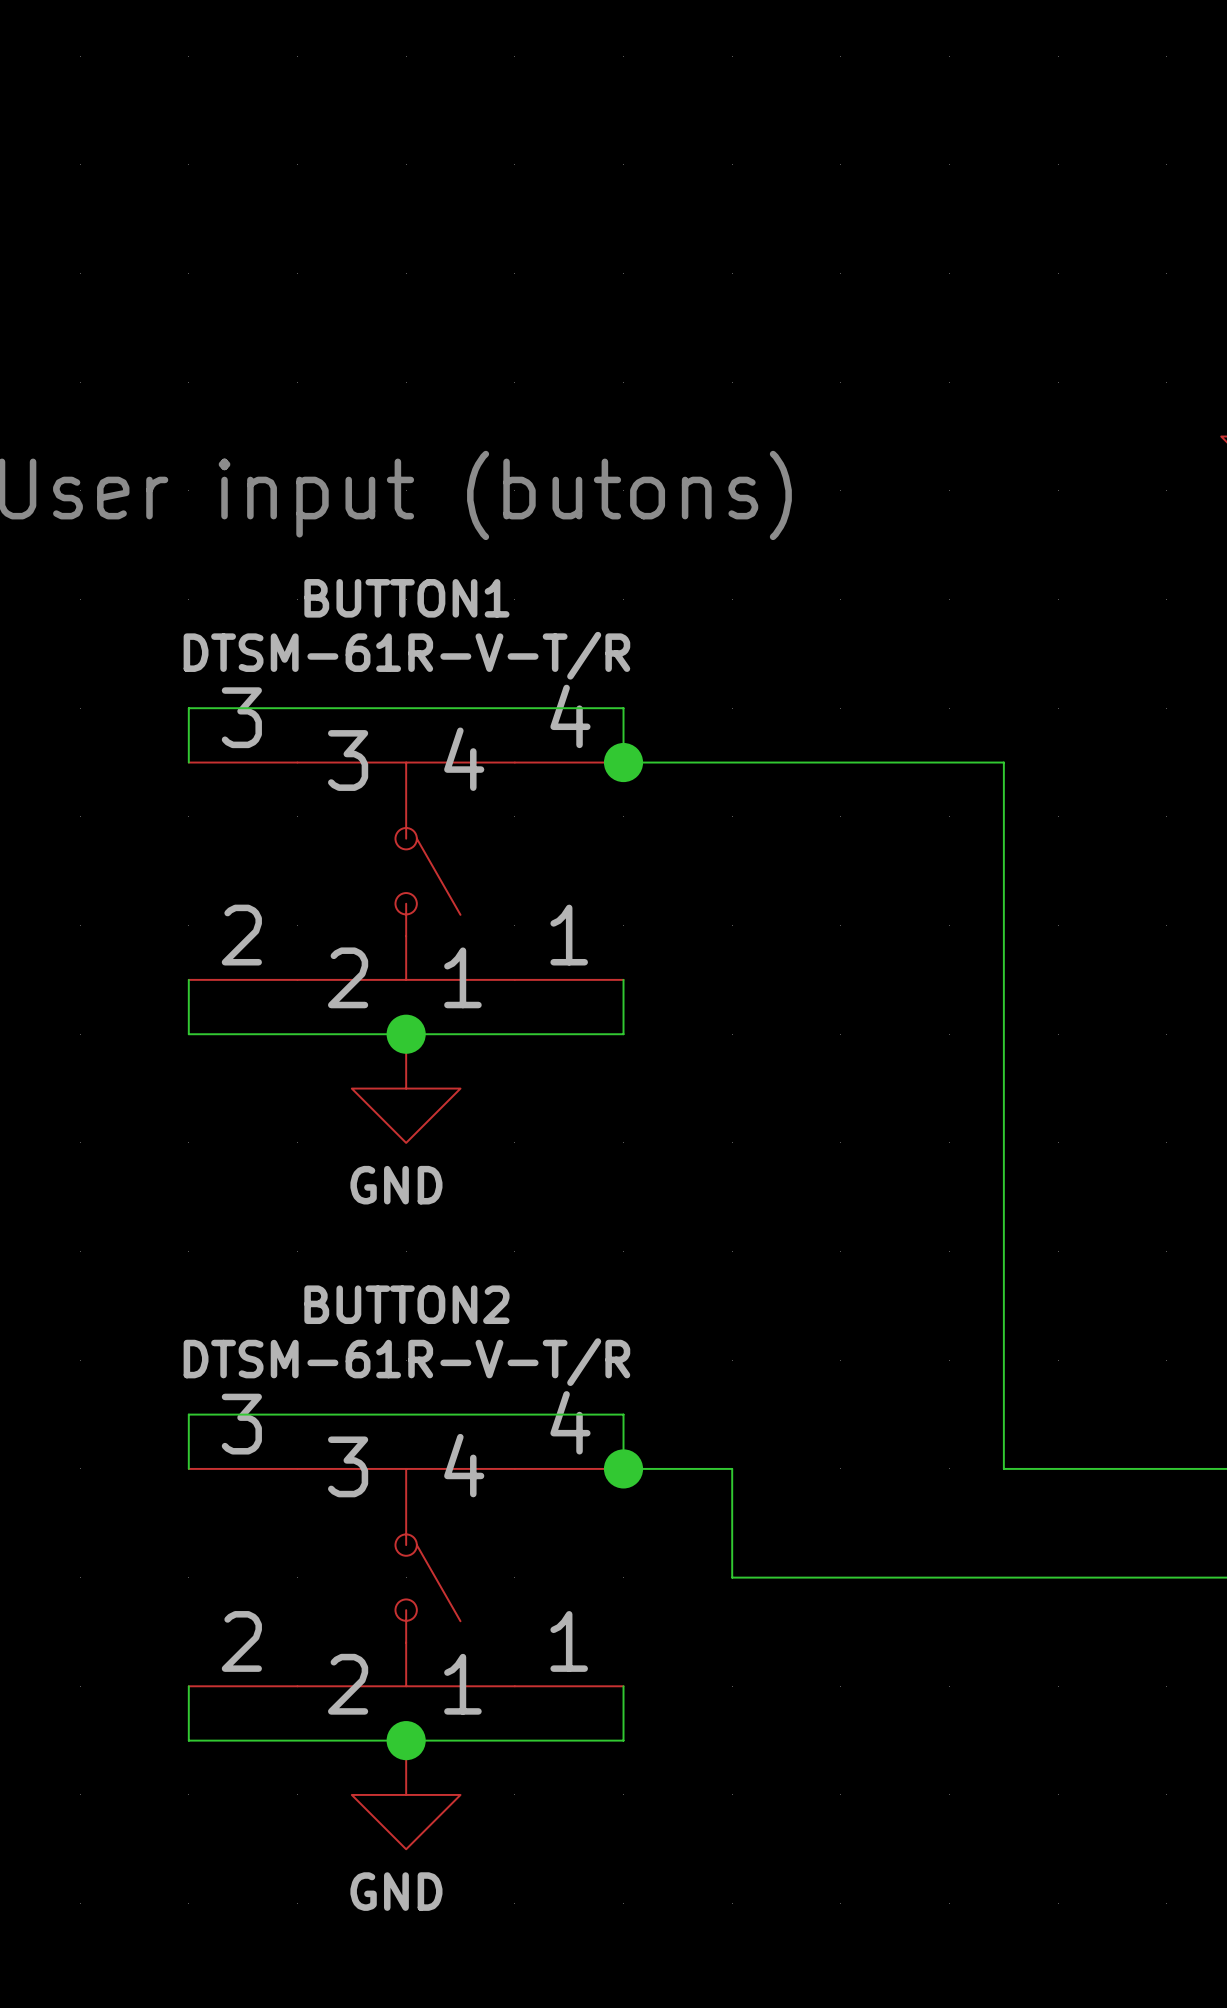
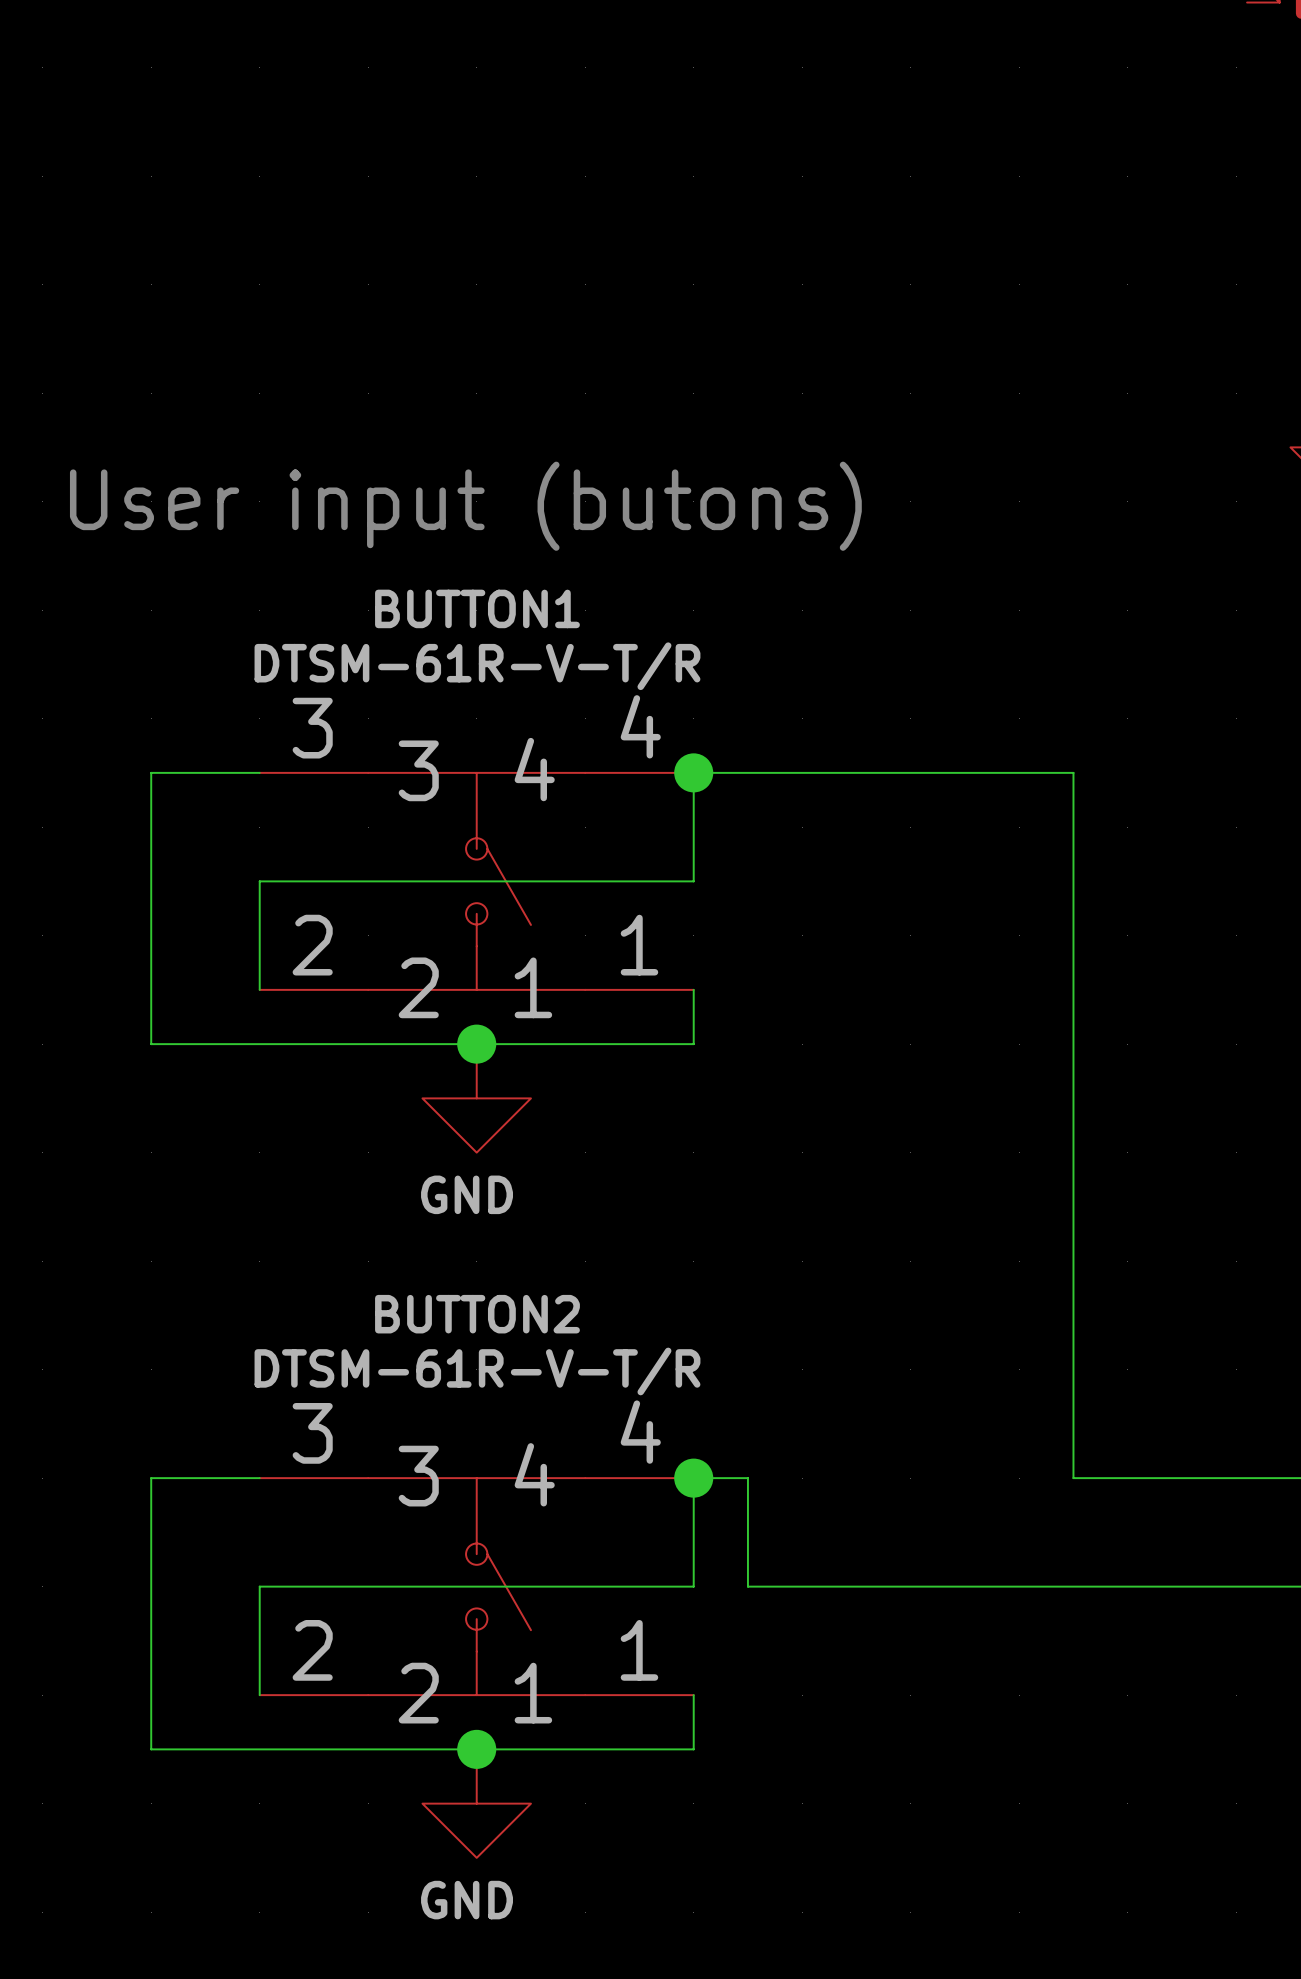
wire: (188, 762) (188, 708) (623, 708) (623, 762) -> (259, 989) (259, 881) (693, 881) (693, 772)
wire: (188, 979) (188, 1034) -> (259, 772) (151, 772) (151, 1044) (259, 1044)
wire: (188, 1468) (188, 1414) (623, 1414) (623, 1468) -> (259, 1695) (259, 1586) (693, 1586) (693, 1478)
wire: (677, 1468) (732, 1468) (732, 1577) -> (747, 1478) (747, 1586) (802, 1586)
wire: (188, 1686) (188, 1740) -> (259, 1478) (151, 1478) (151, 1749) (259, 1749)

